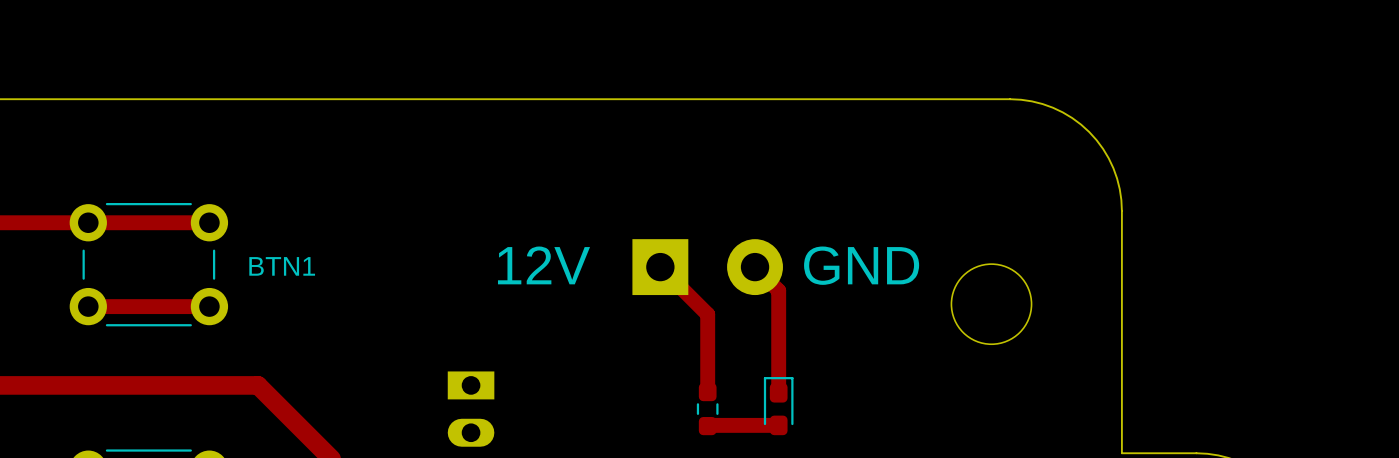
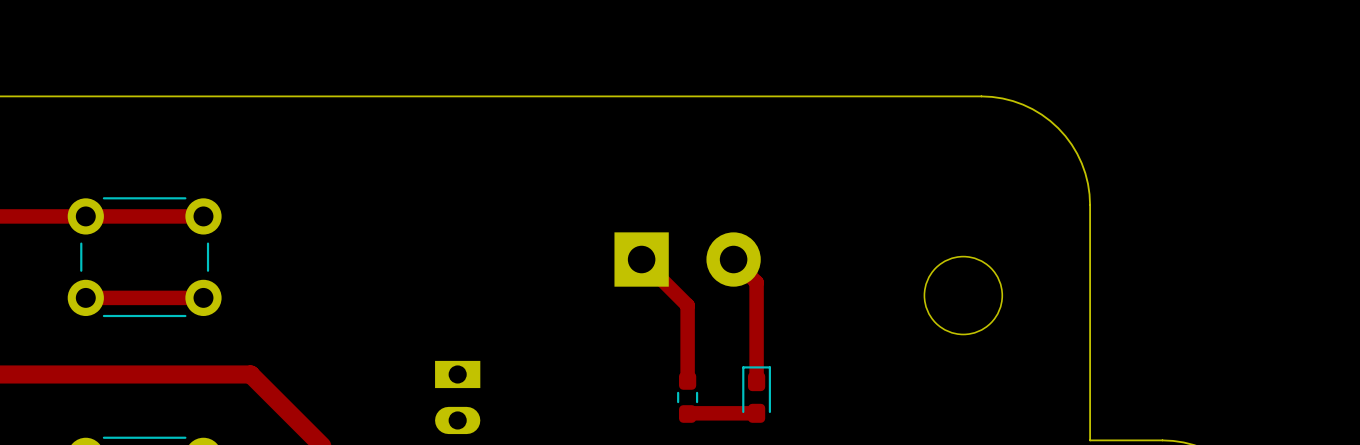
text: 12V (543, 265) -> none
text: GND (861, 265) -> none
text: BTN1 (282, 266) -> none

